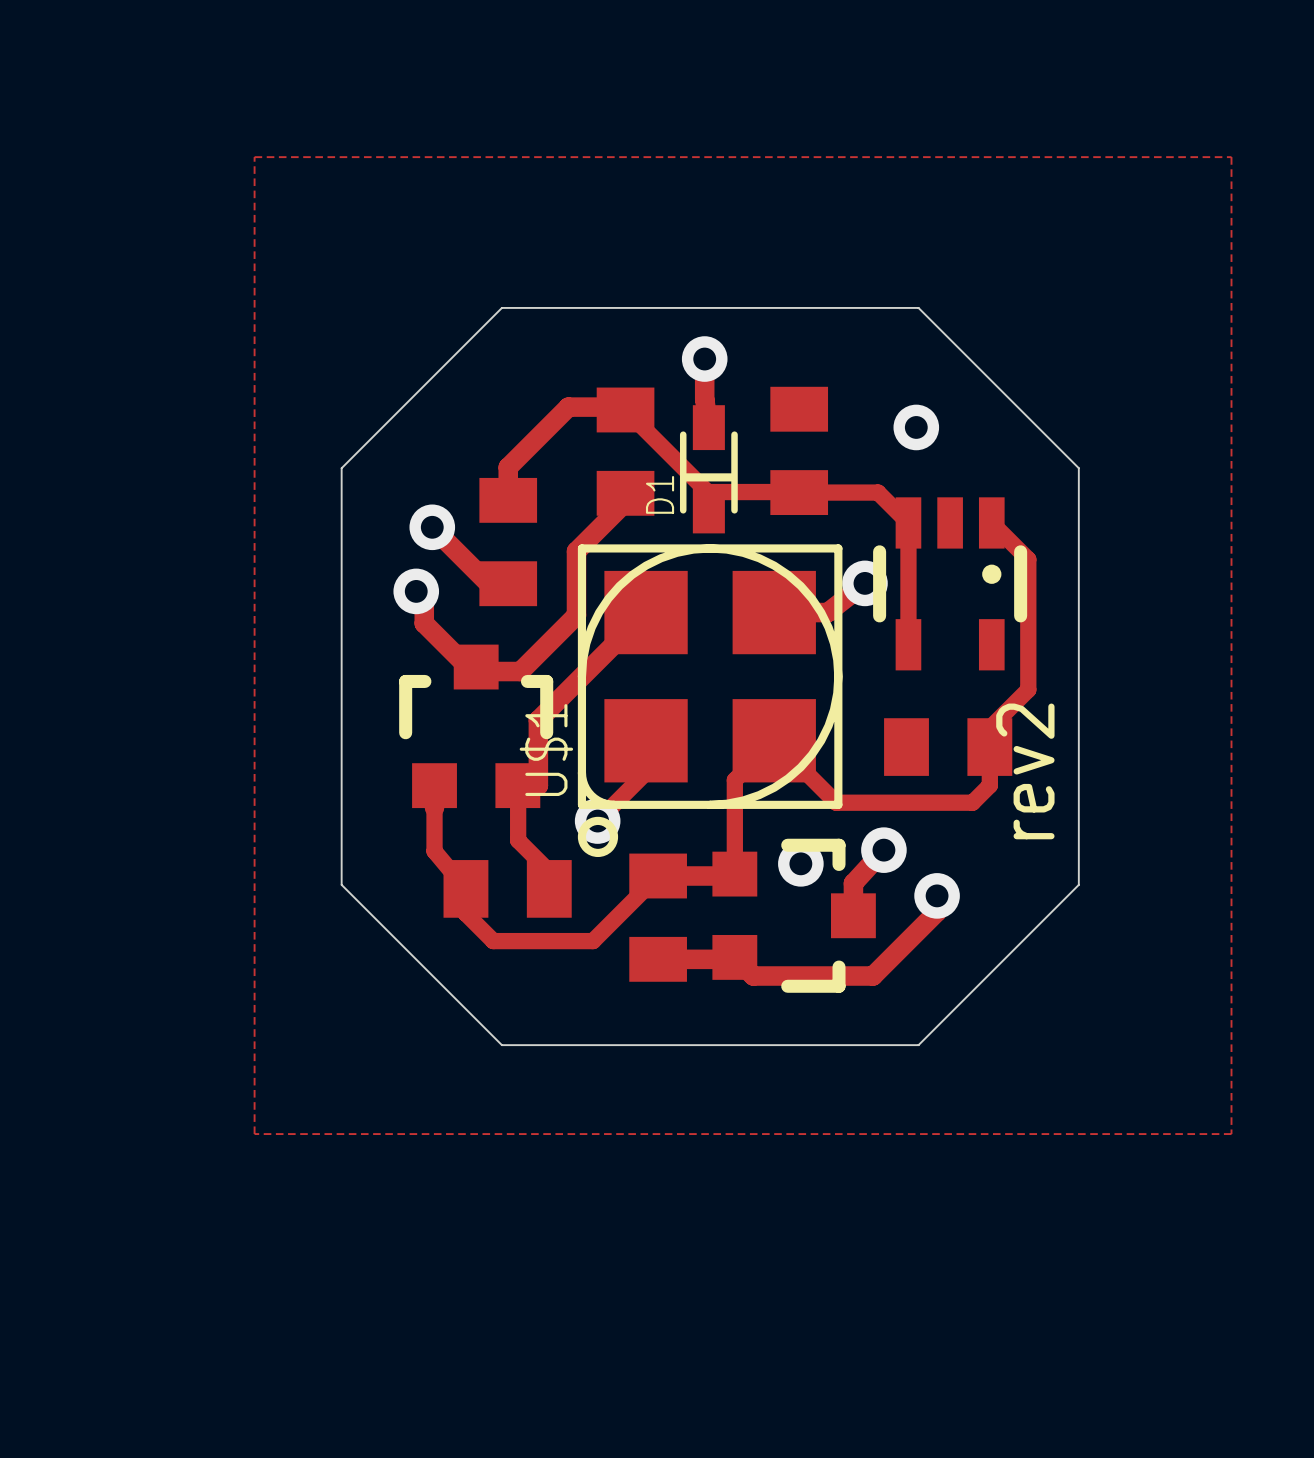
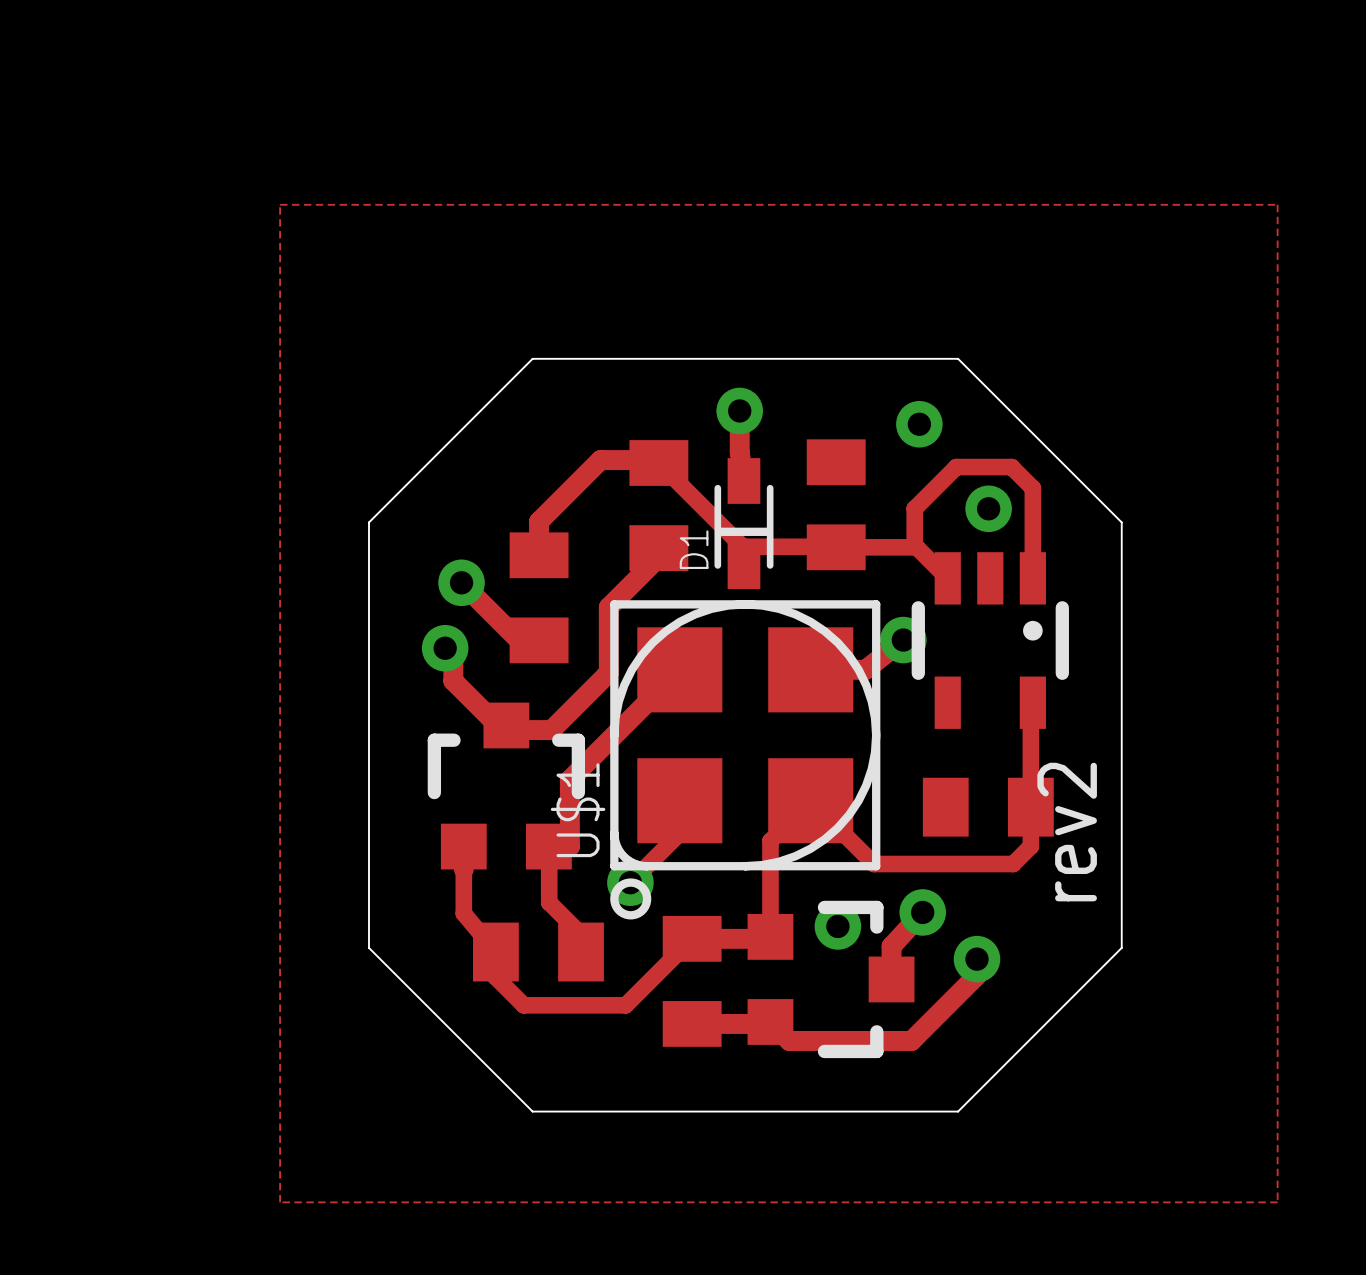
via: none -> (919, 424)
via position: (916, 427) -> (988, 508)
track: none -> (916, 547) (914, 545) (914, 508) (956, 467) (1011, 467) (1032, 488) (1032, 578)
track: (908, 522) (908, 644) -> none
track: (992, 523) (1028, 559) (1028, 689) (989, 728) -> (1032, 702) (1030, 704) (1030, 787)

